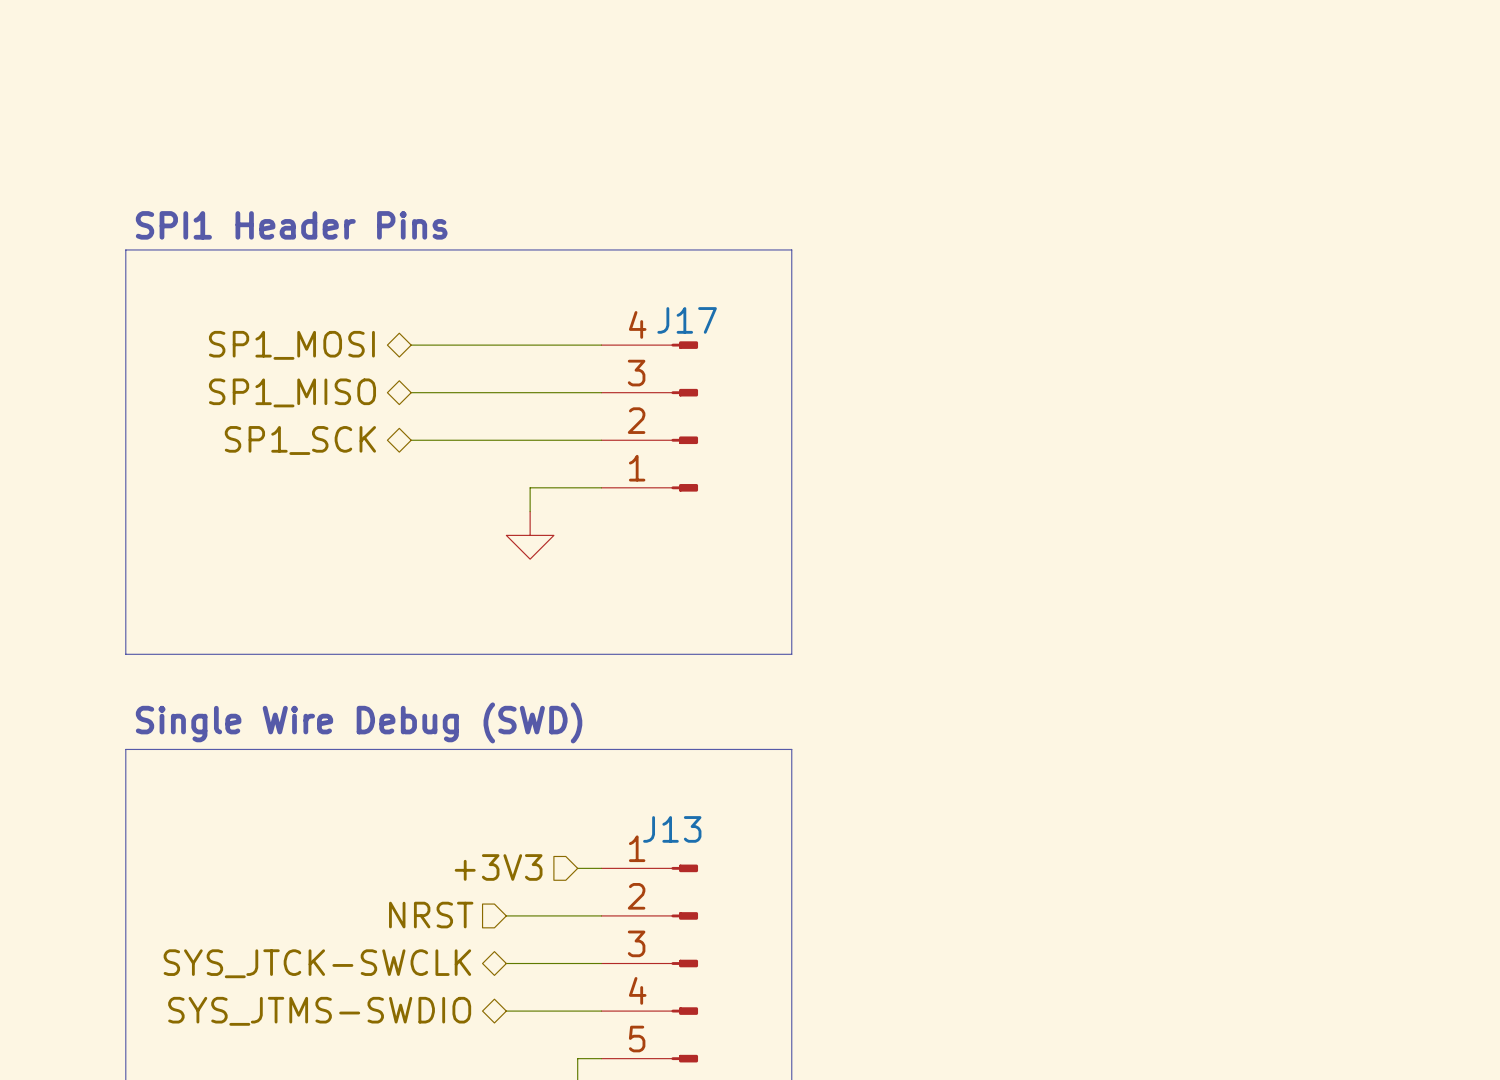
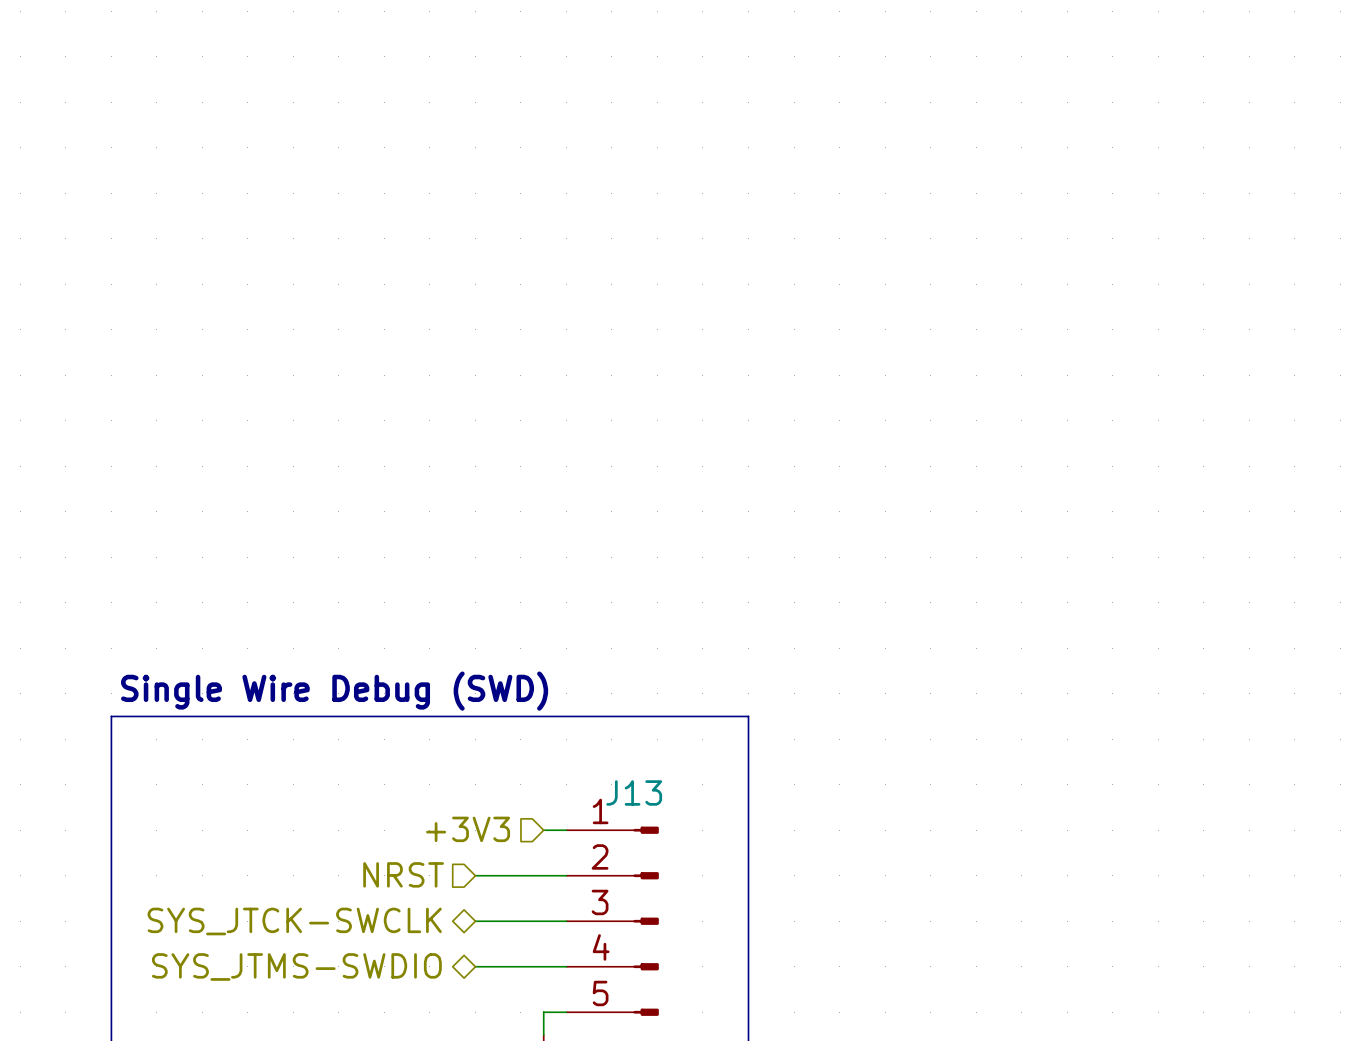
text: SPI1 Header Pins (291, 225) -> none
line: (125, 249) (791, 249) (791, 654) (125, 654) (125, 249) -> none
hierarchical label: SP1_MOSI (291, 345) -> none
wire: (411, 345) (601, 345) -> none
hierarchical label: SP1_MISO (292, 392) -> none
wire: (411, 392) (601, 392) -> none
J17: (649, 416) -> none
hierarchical label: SP1_SCK (300, 440) -> none
wire: (411, 440) (601, 440) -> none
wire: (601, 487) (530, 487) (530, 511) -> none
power symbol: (530, 535) -> none

